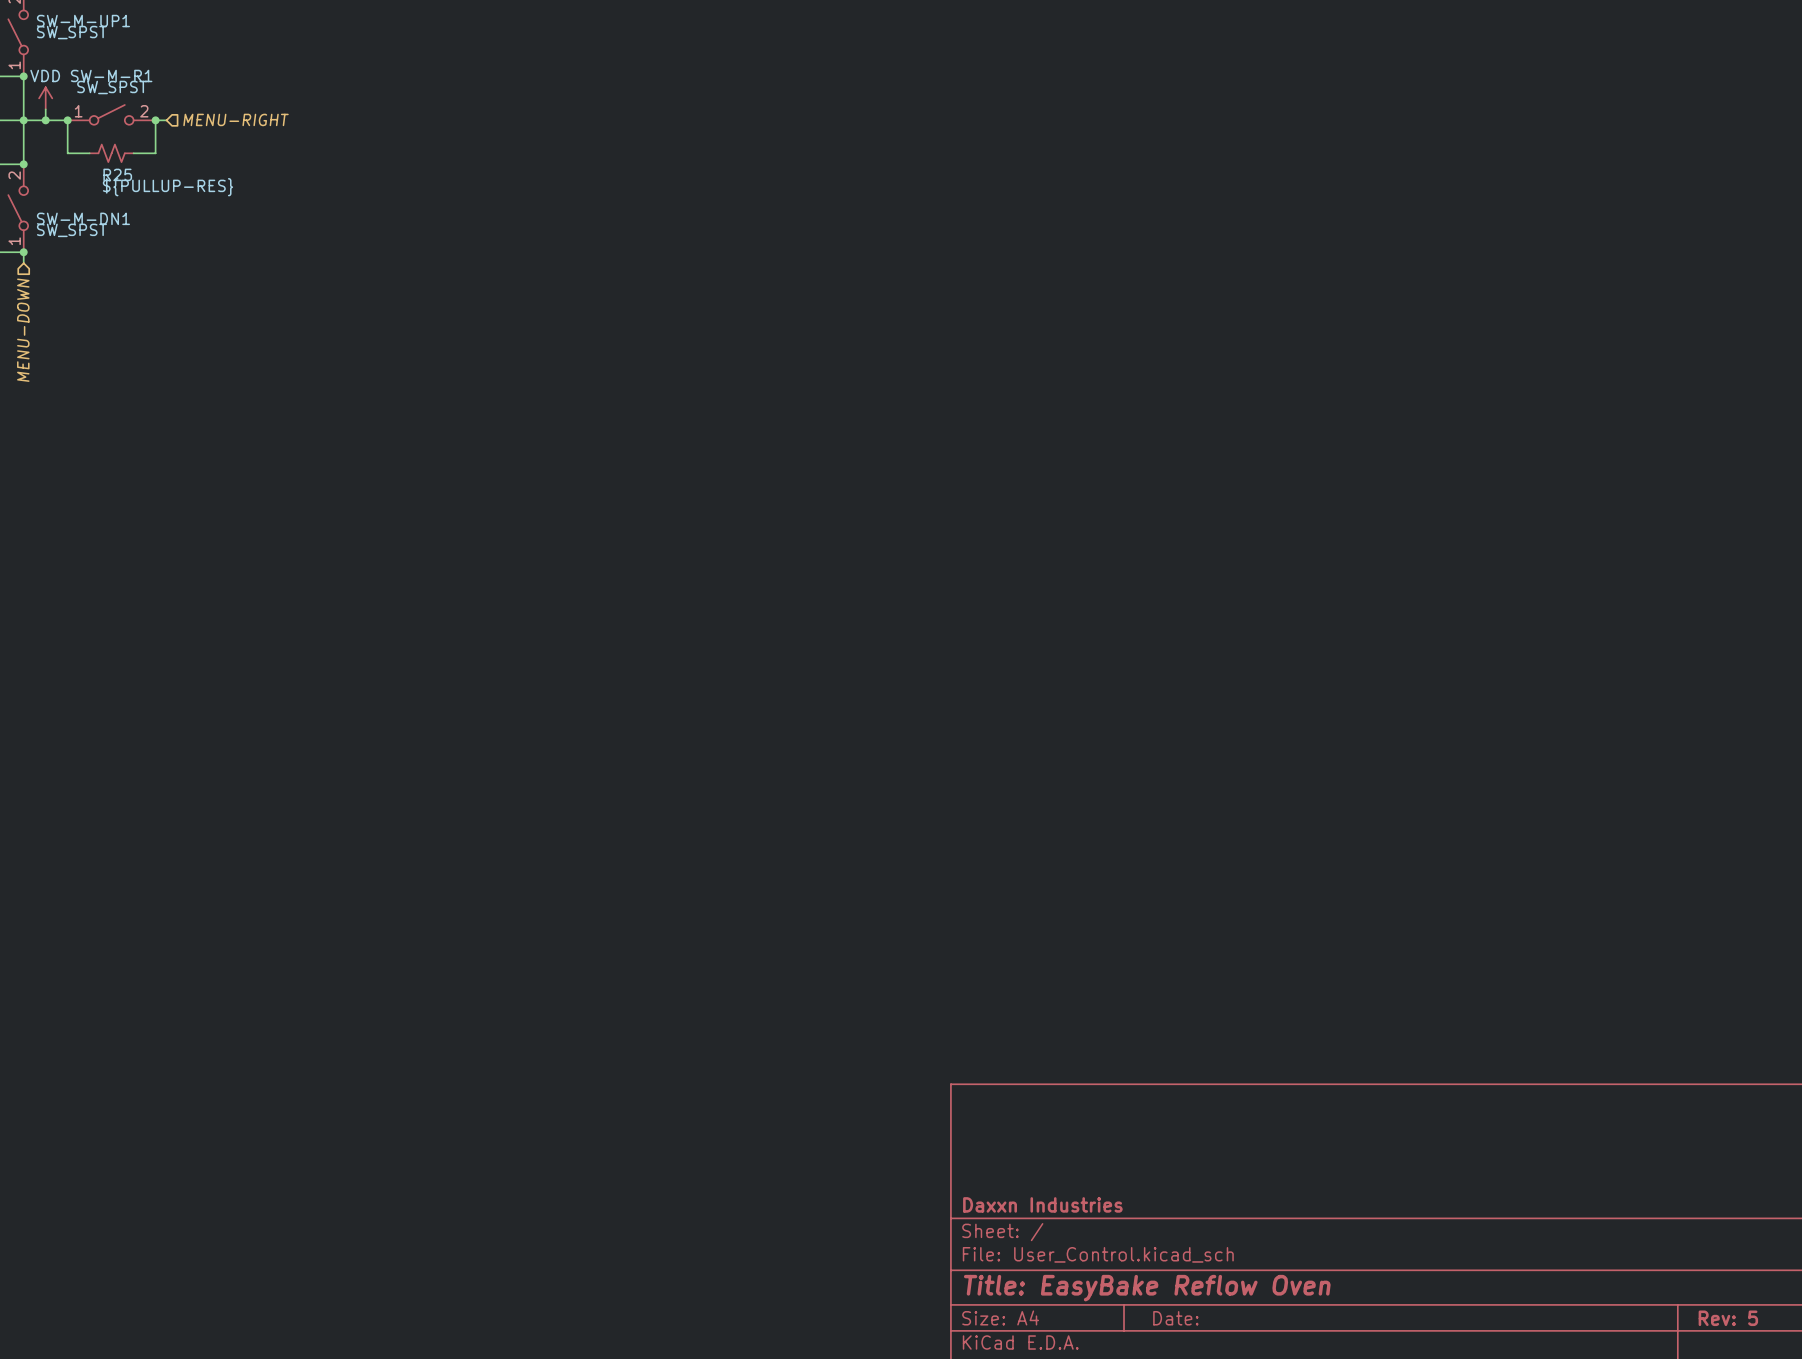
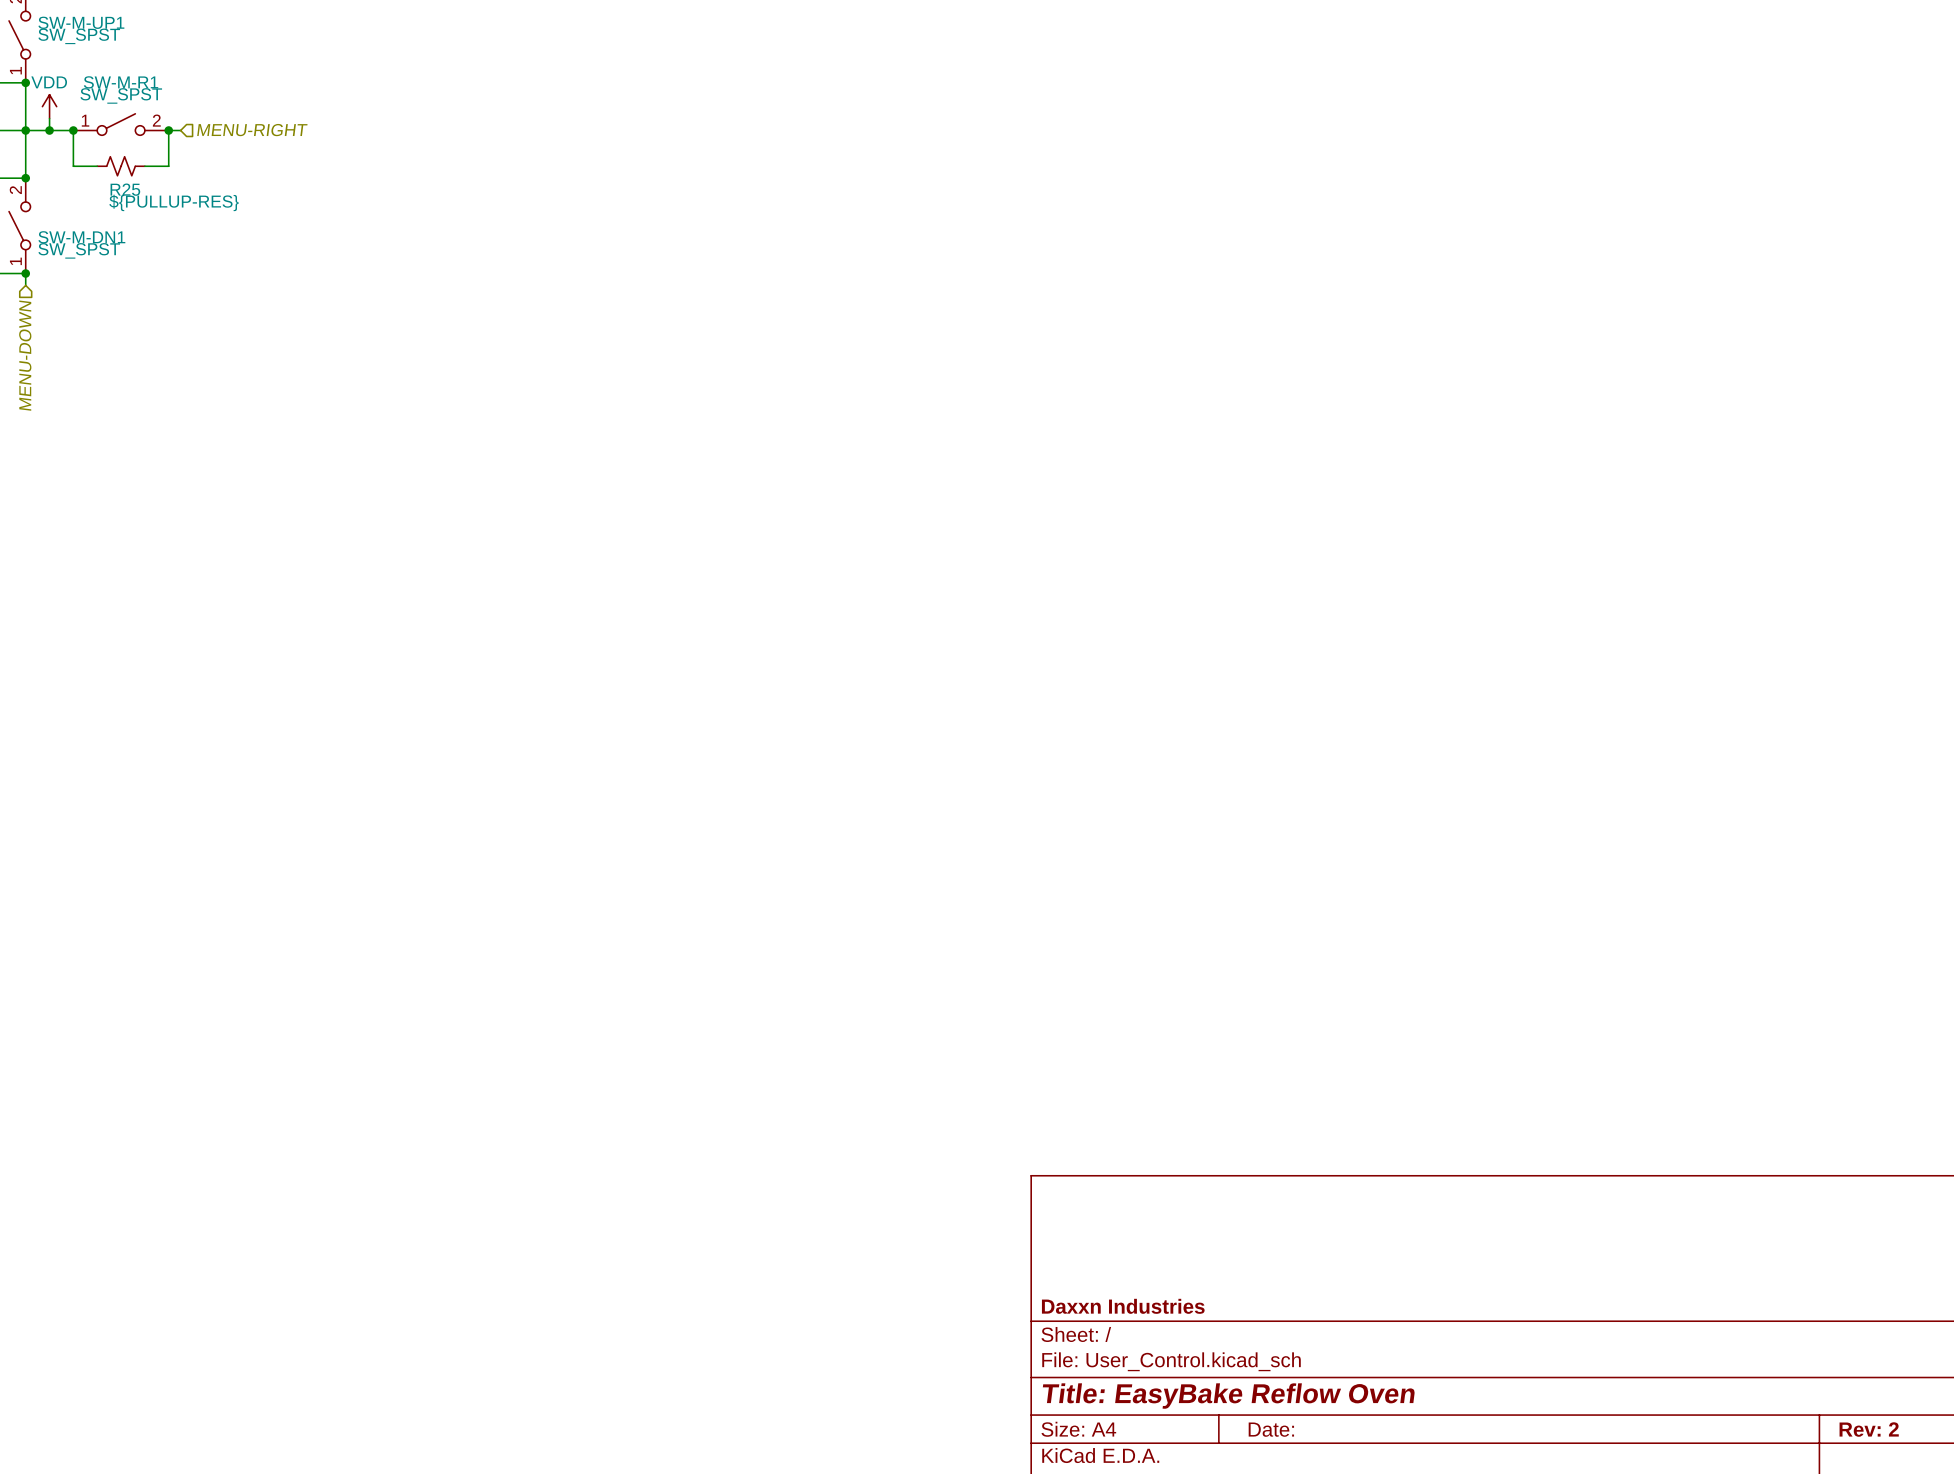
title block: Rev: 5 (1728, 1318) -> Rev: 2 (1869, 1429)

